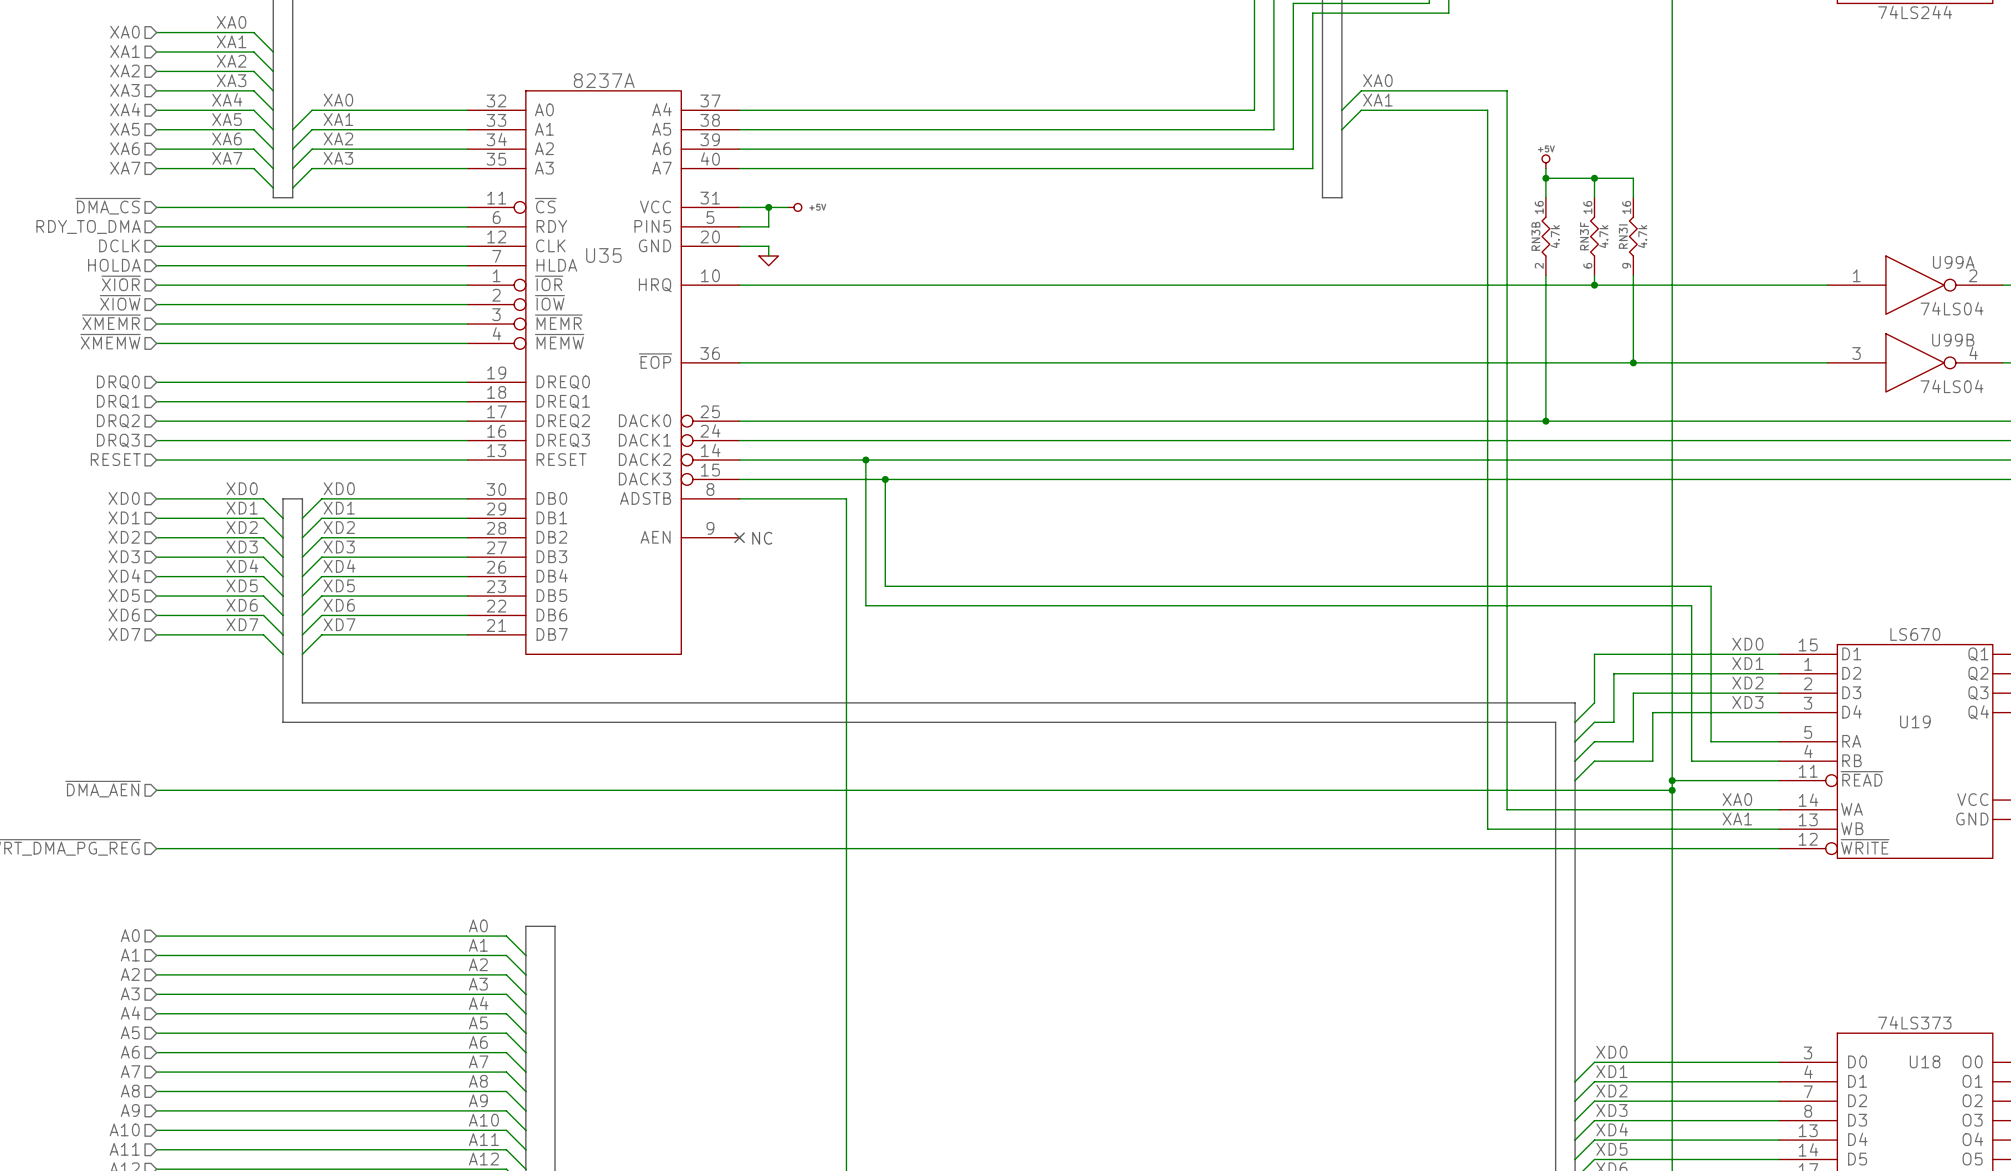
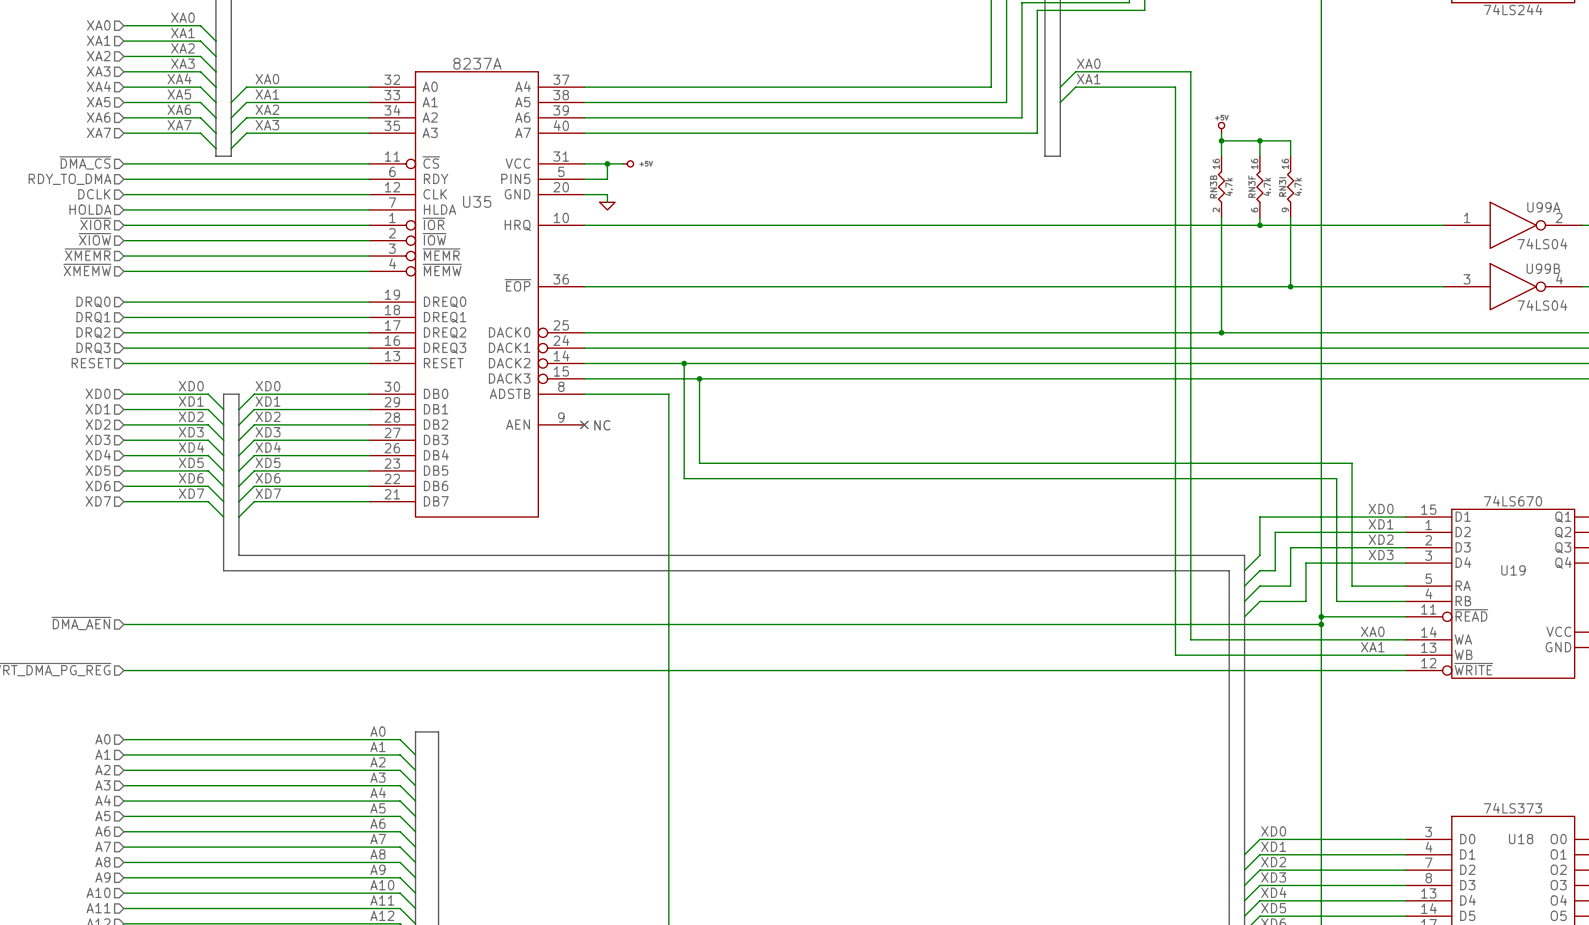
U19 value: LS670 (1915, 634) -> 74LS670 (1513, 501)

